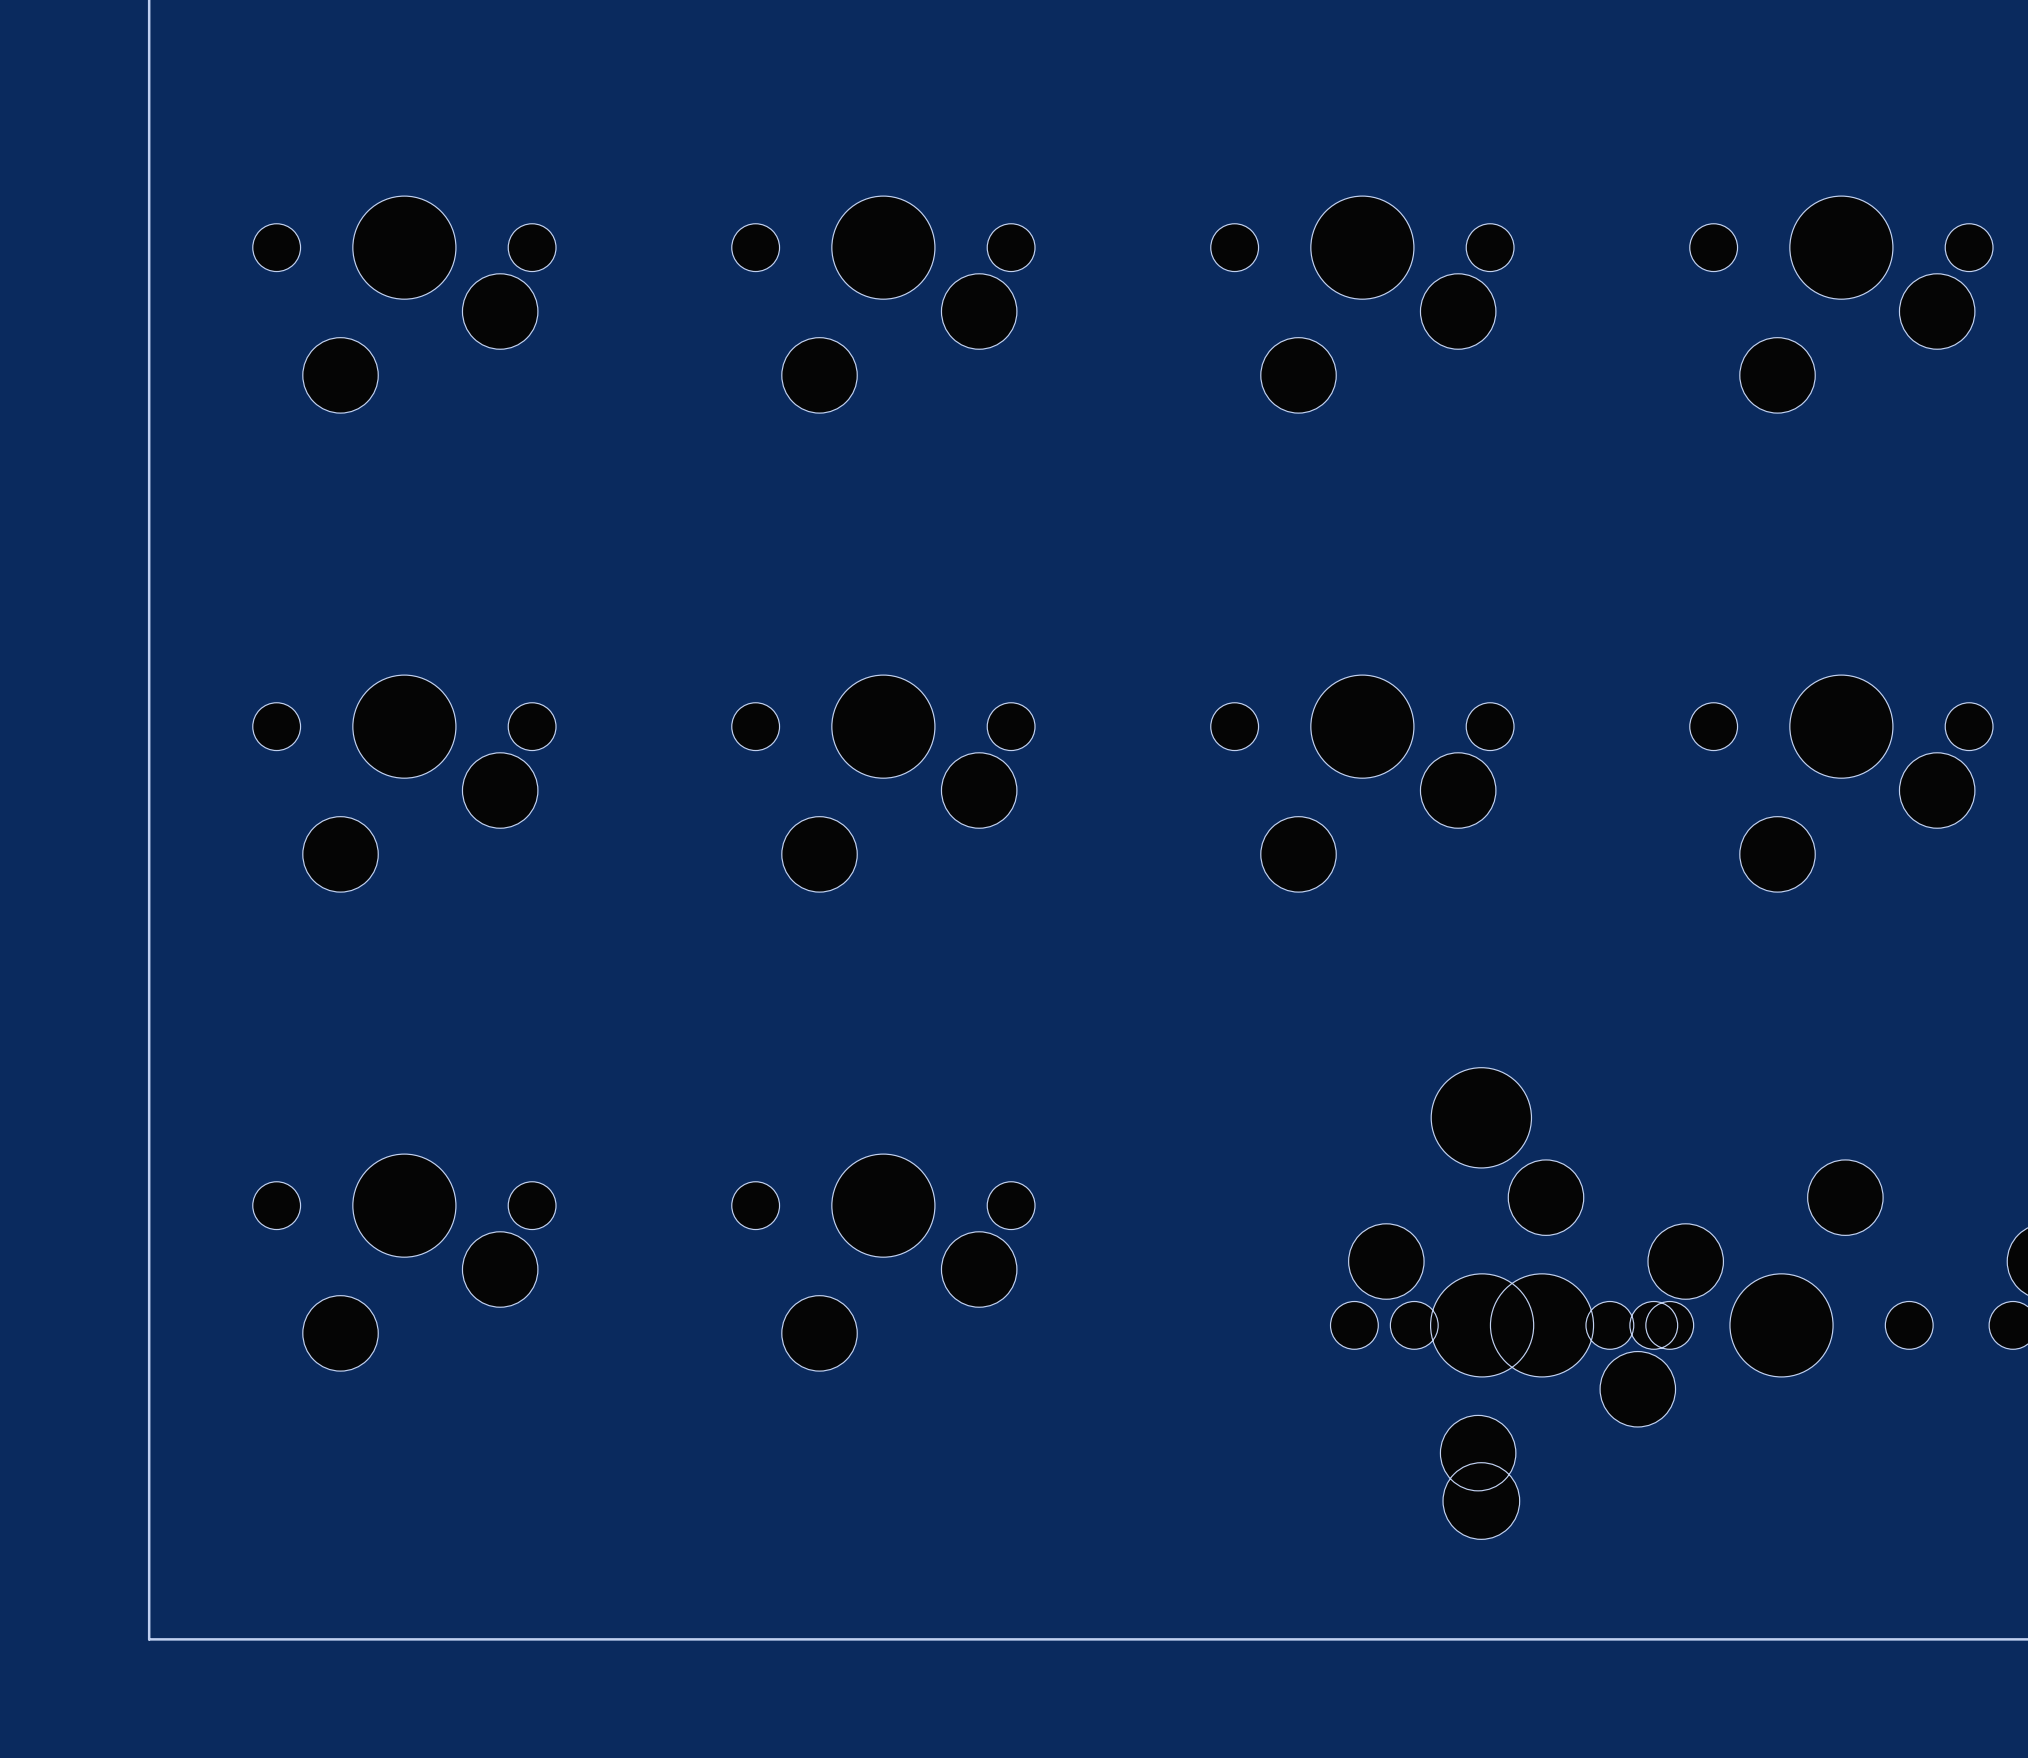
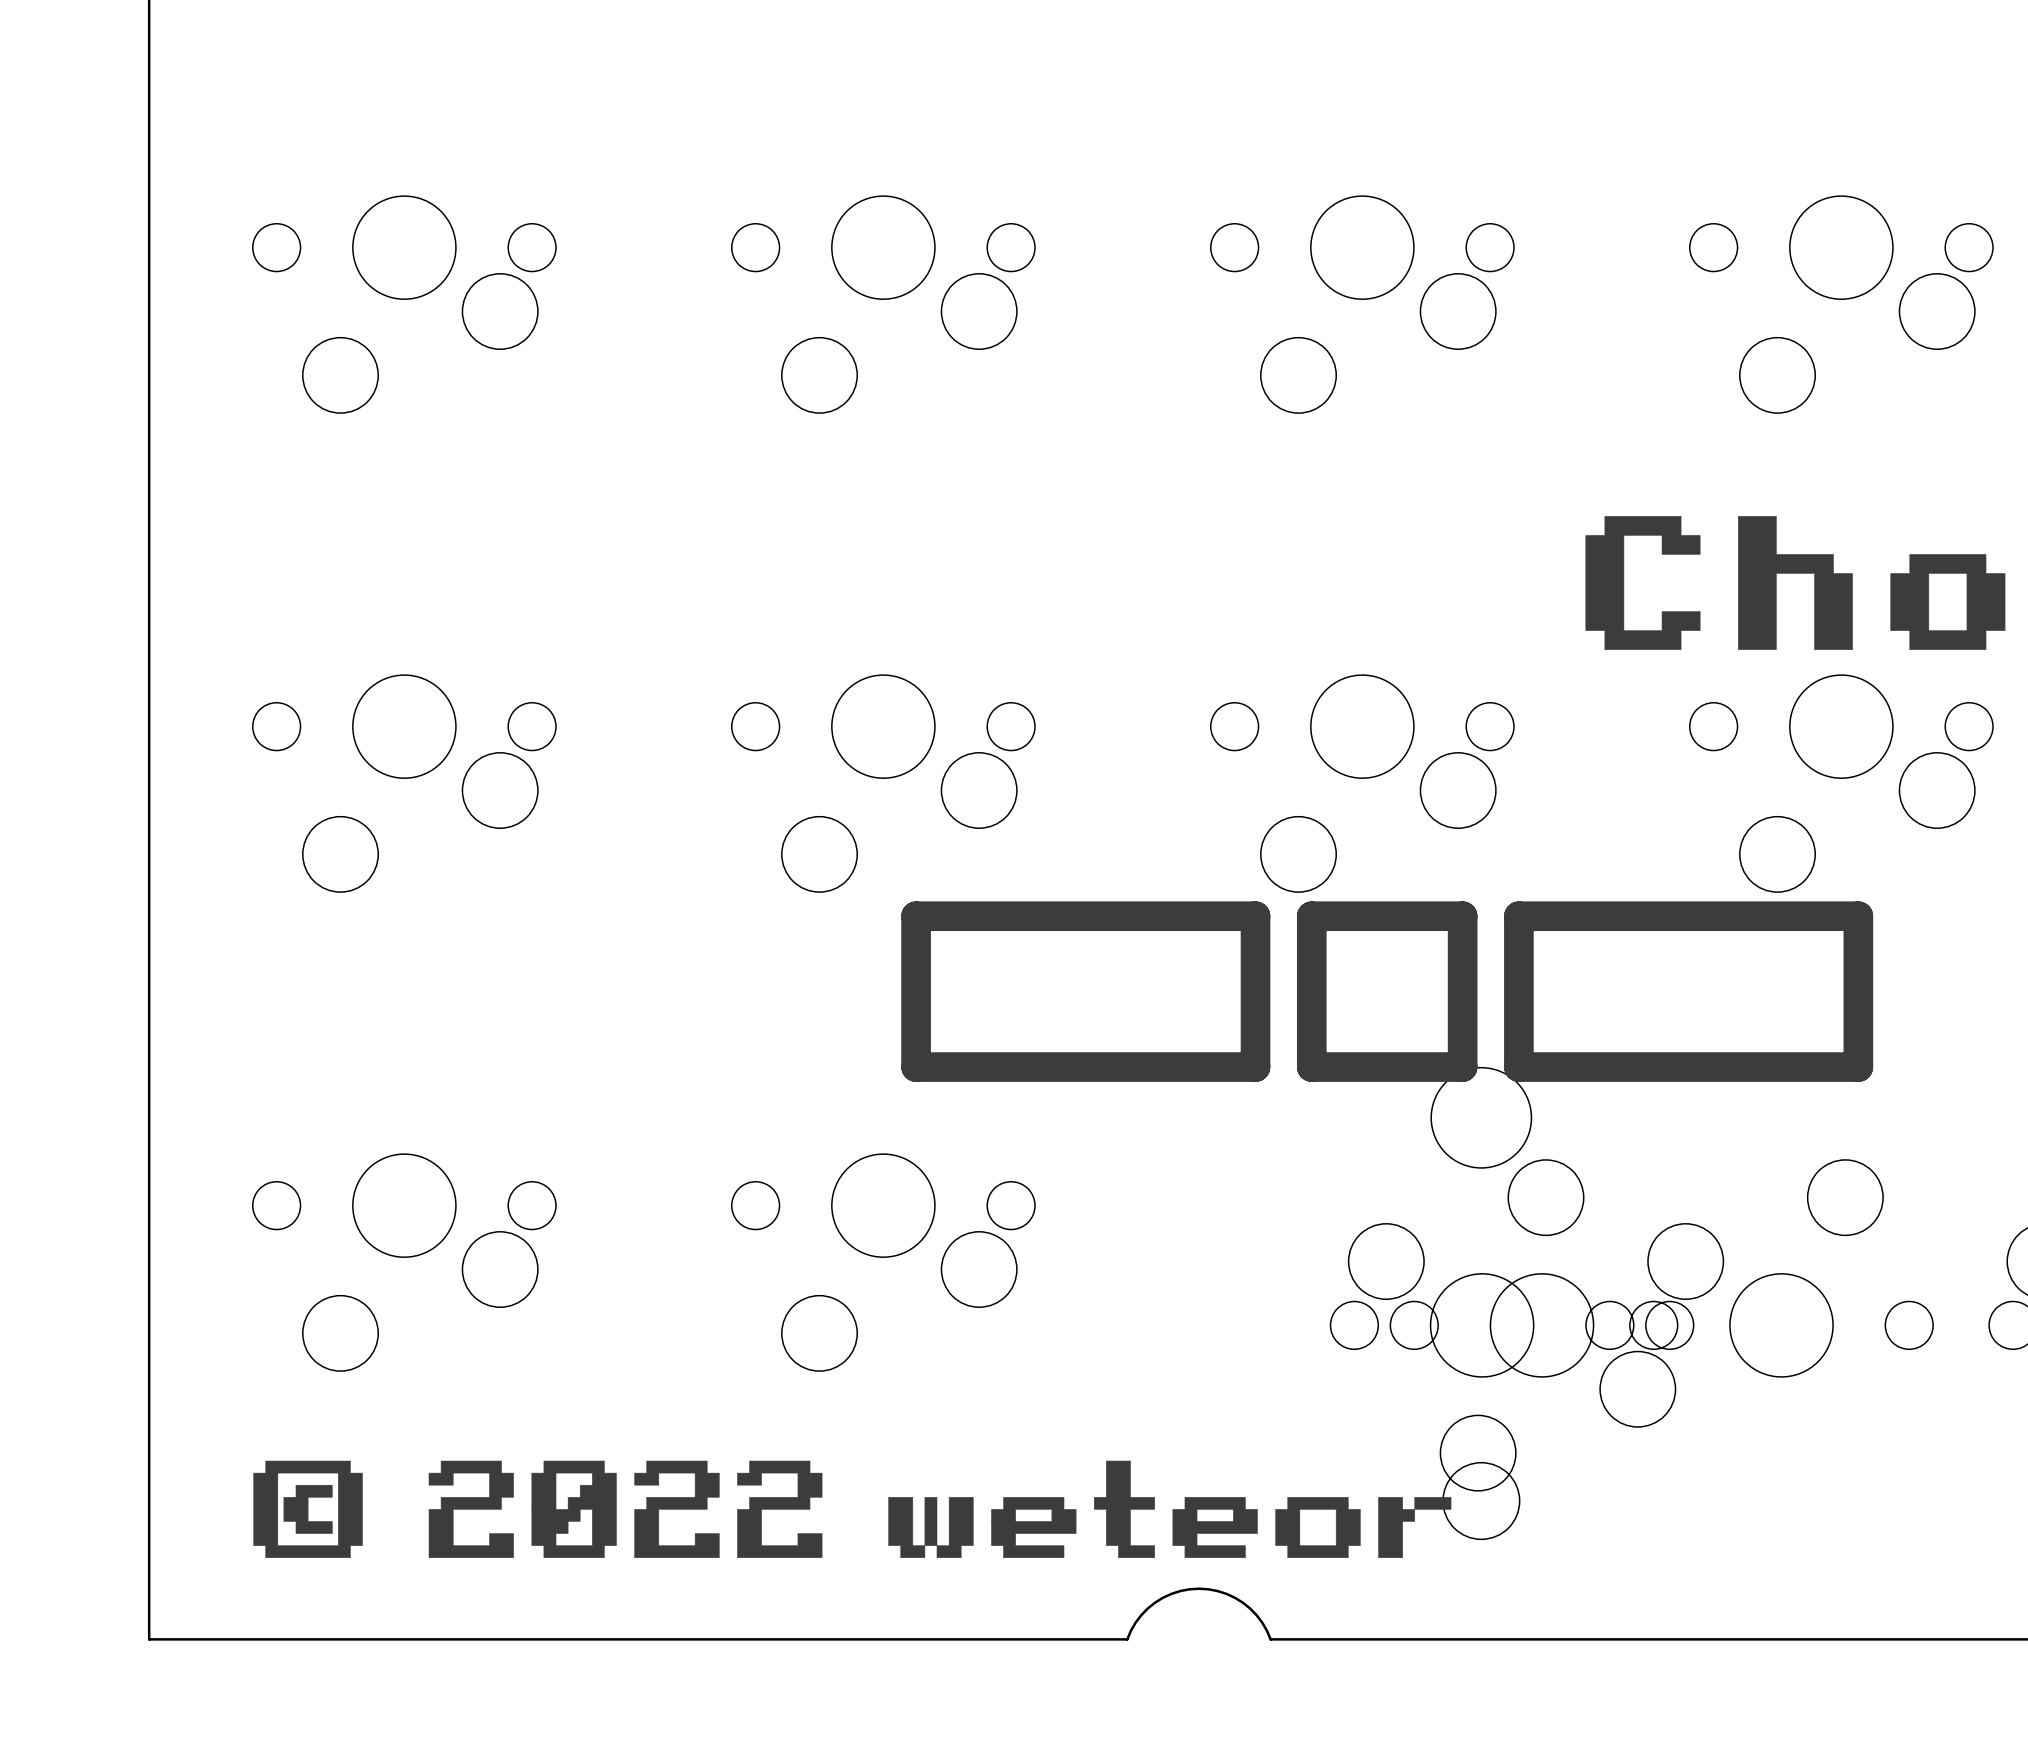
drawing: none -> [1585, 516, 1701, 650]
drawing: none -> [1738, 516, 1853, 650]
drawing: none -> [1890, 554, 2006, 650]
line: none -> (916, 916) (916, 1067) (1255, 1067) (1255, 916) (916, 916)
line: none -> (1311, 916) (1462, 916) (1462, 1067) (1311, 1067) (1311, 916)
line: none -> (1518, 916) (1858, 916) (1858, 1067) (1518, 1067) (1518, 916)
drawing: none -> [253, 1460, 363, 1558]
drawing: none -> [428, 1460, 823, 1558]
drawing: none -> [888, 1460, 1452, 1558]
board edge: (1127, 1639) (1270, 1639) -> (1127, 1639) (1141, 1615) (1155, 1602) (1171, 1593) (1198, 1588) (1217, 1591) (1242, 1602) (1262, 1622) (1270, 1639)

